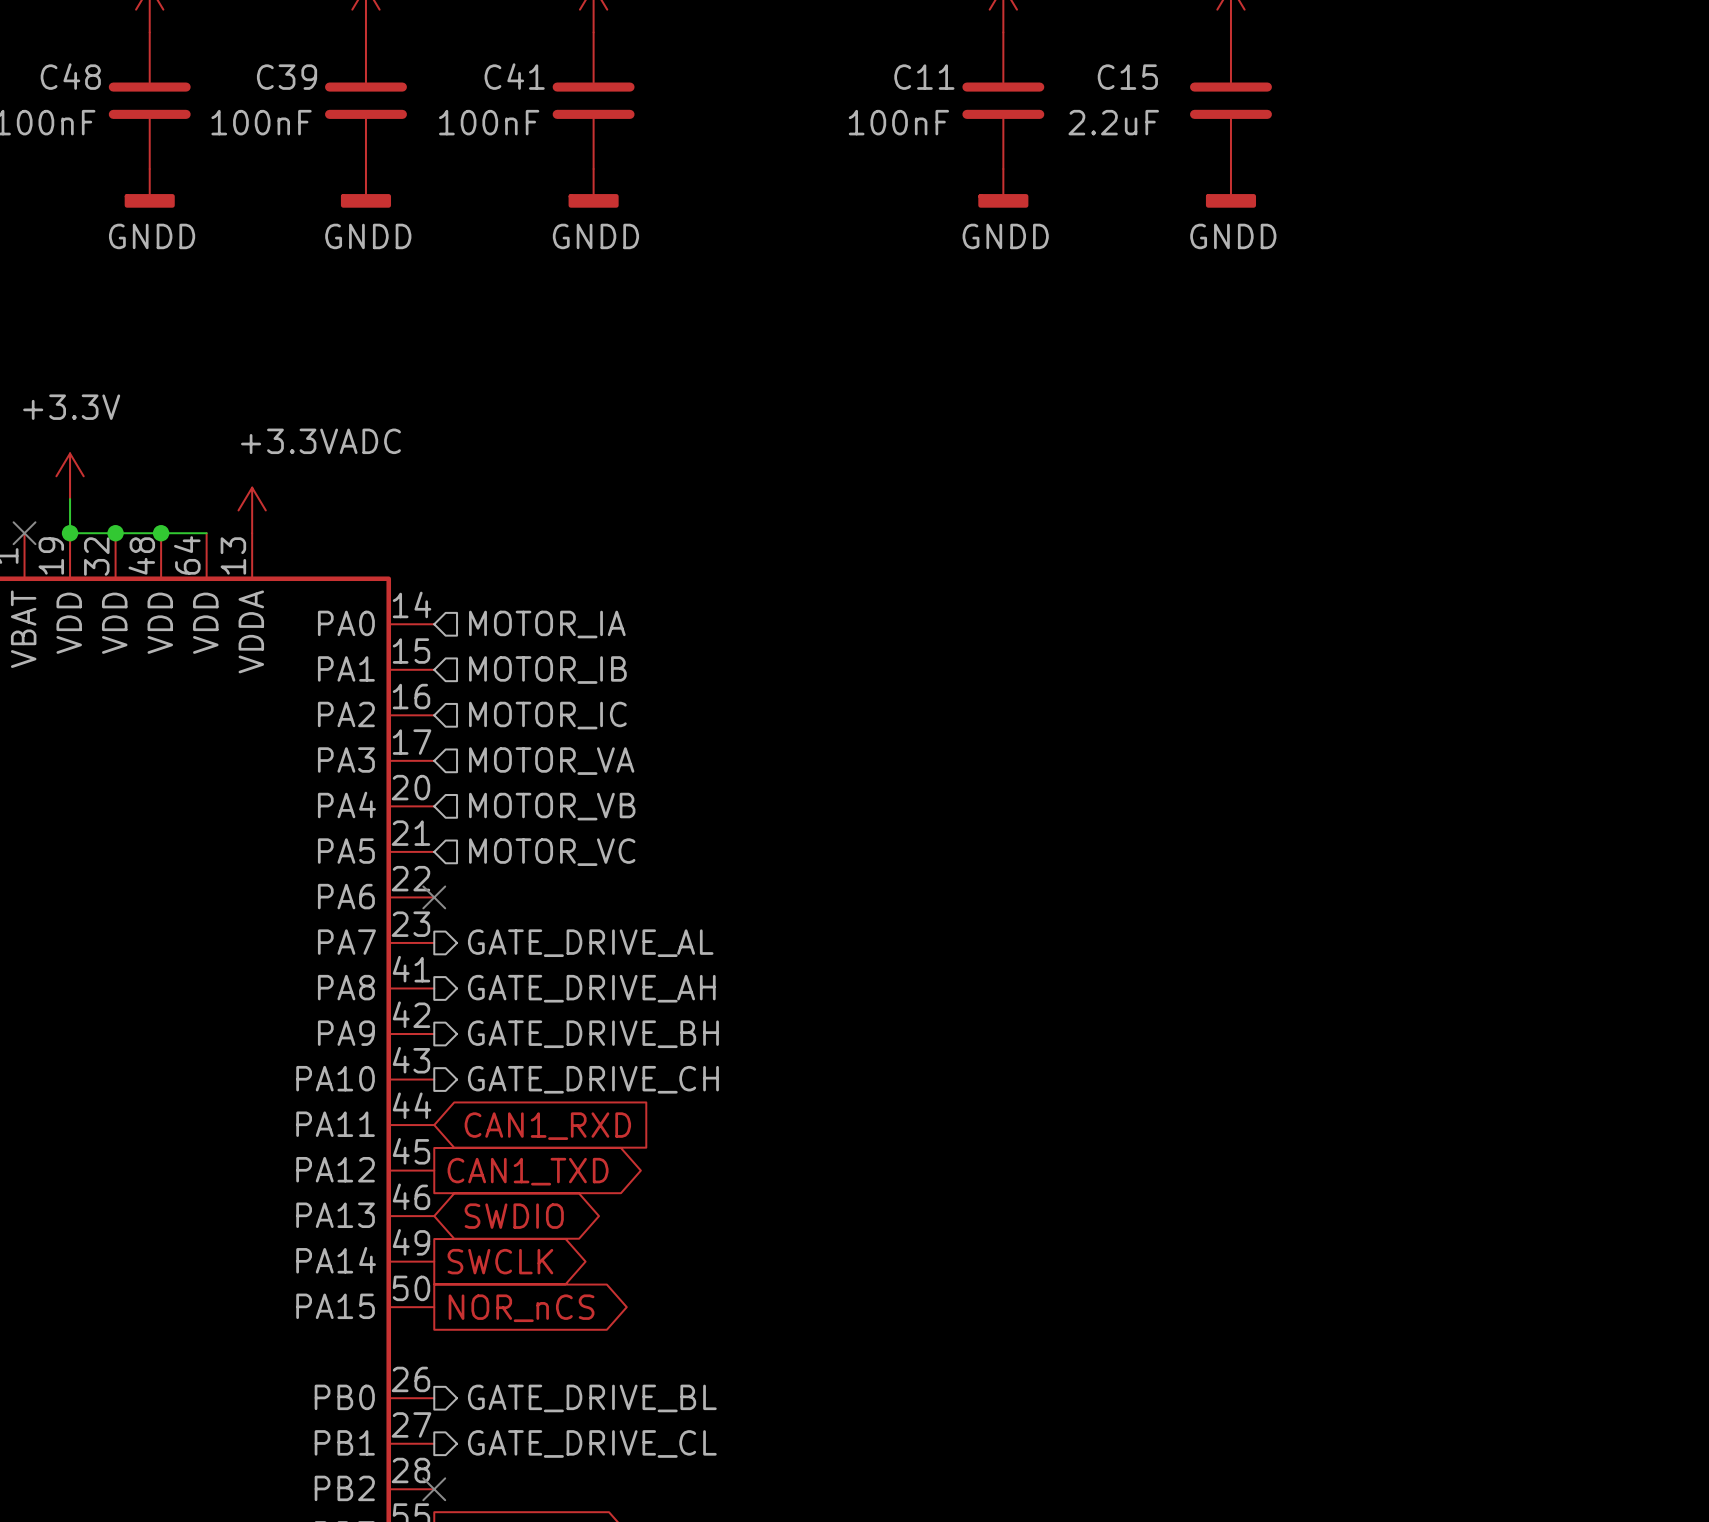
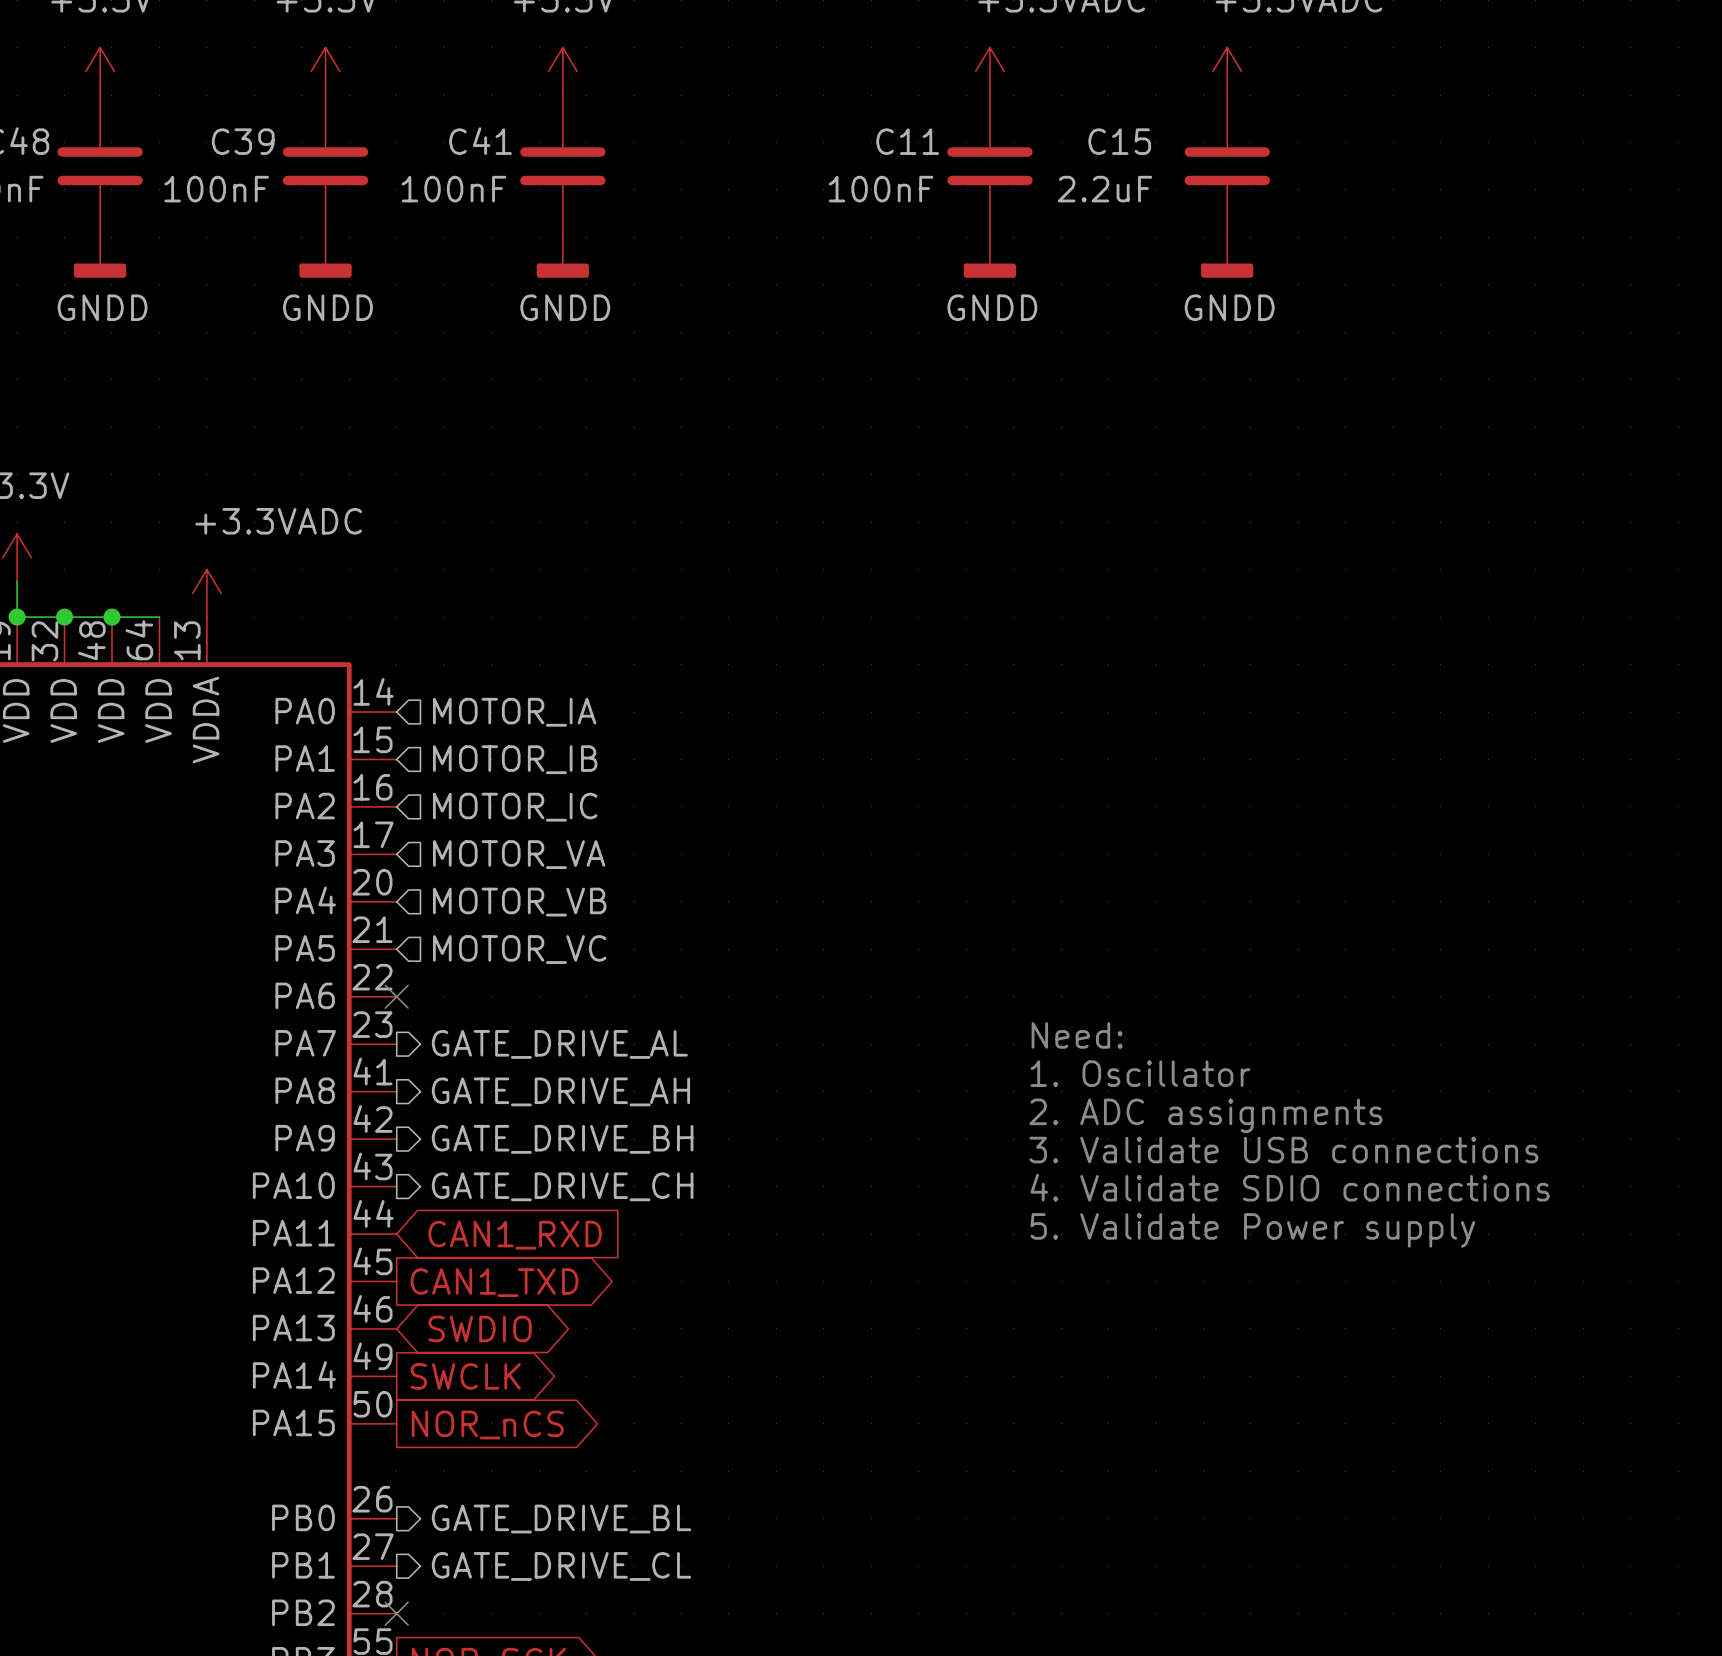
text: none -> Need: (1077, 1035)
text: none -> 1. Oscillator (1140, 1073)
text: none -> 2. ADC assignments (1205, 1115)
text: none -> 3. Validate USB connections (1283, 1150)
text: none -> 4. Validate SDIO connections (1290, 1187)
text: none -> 5. Validate Power supply (1252, 1230)

